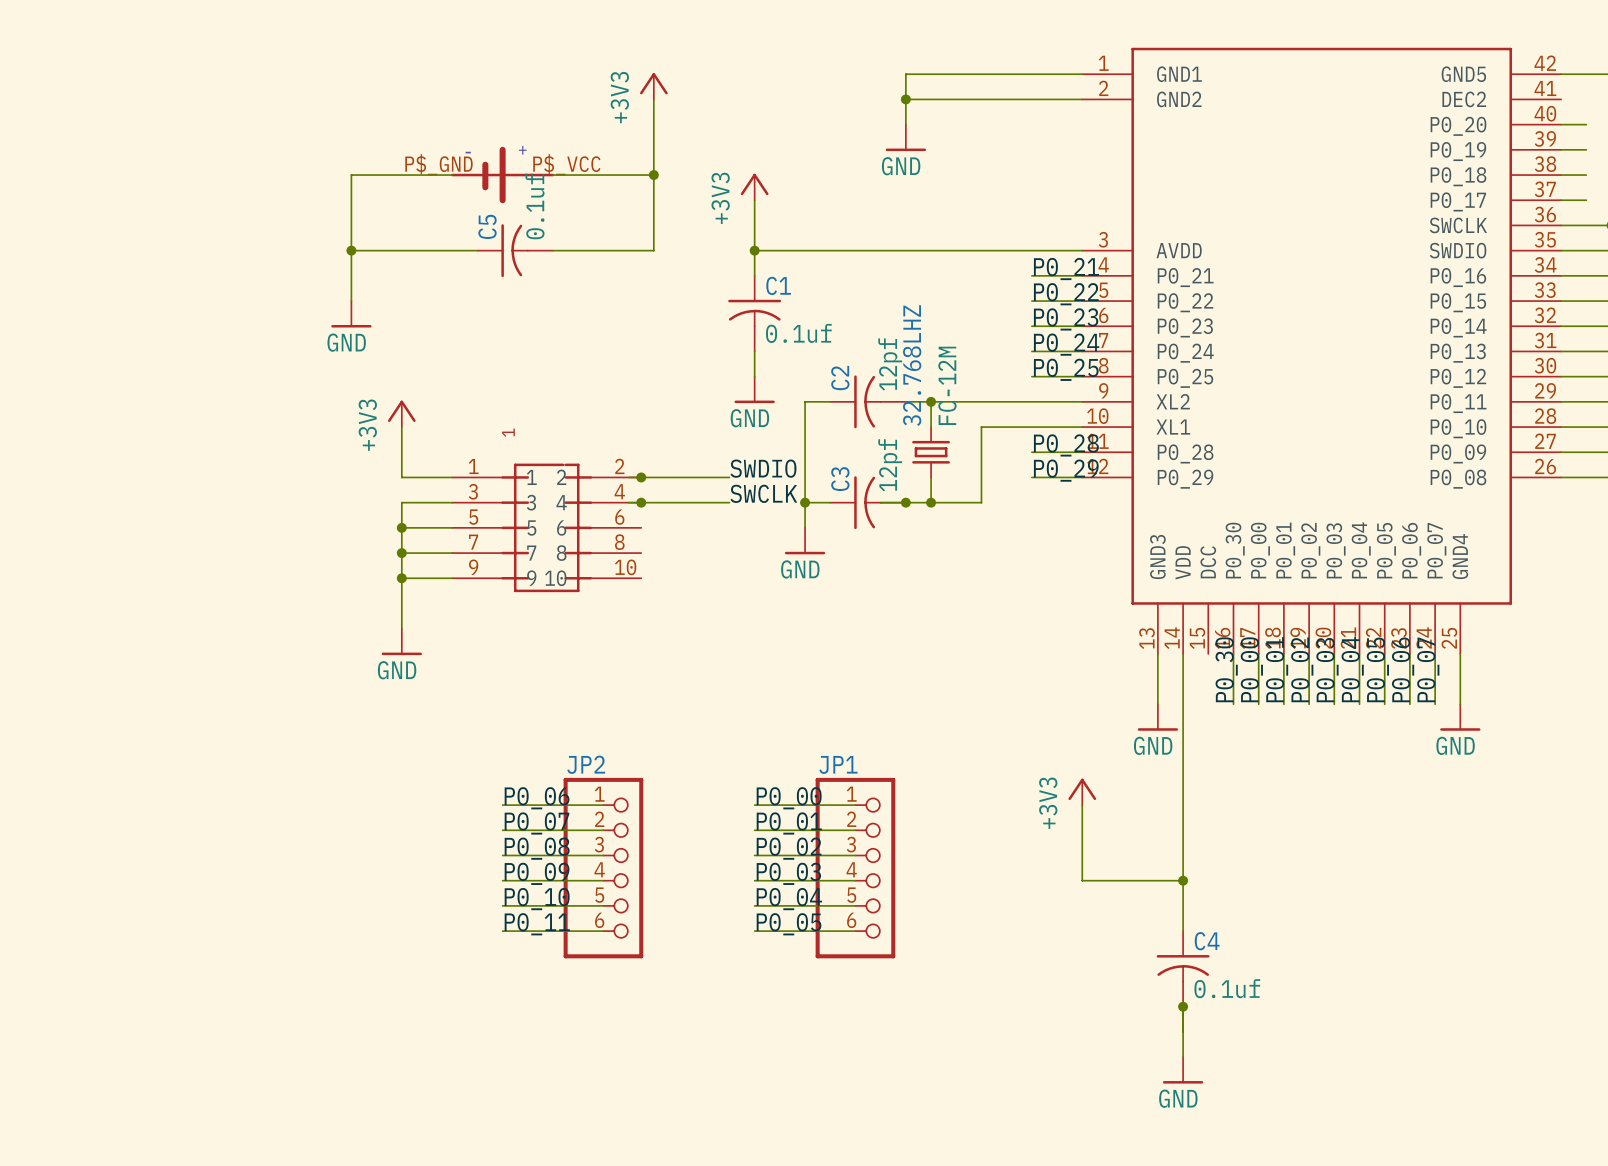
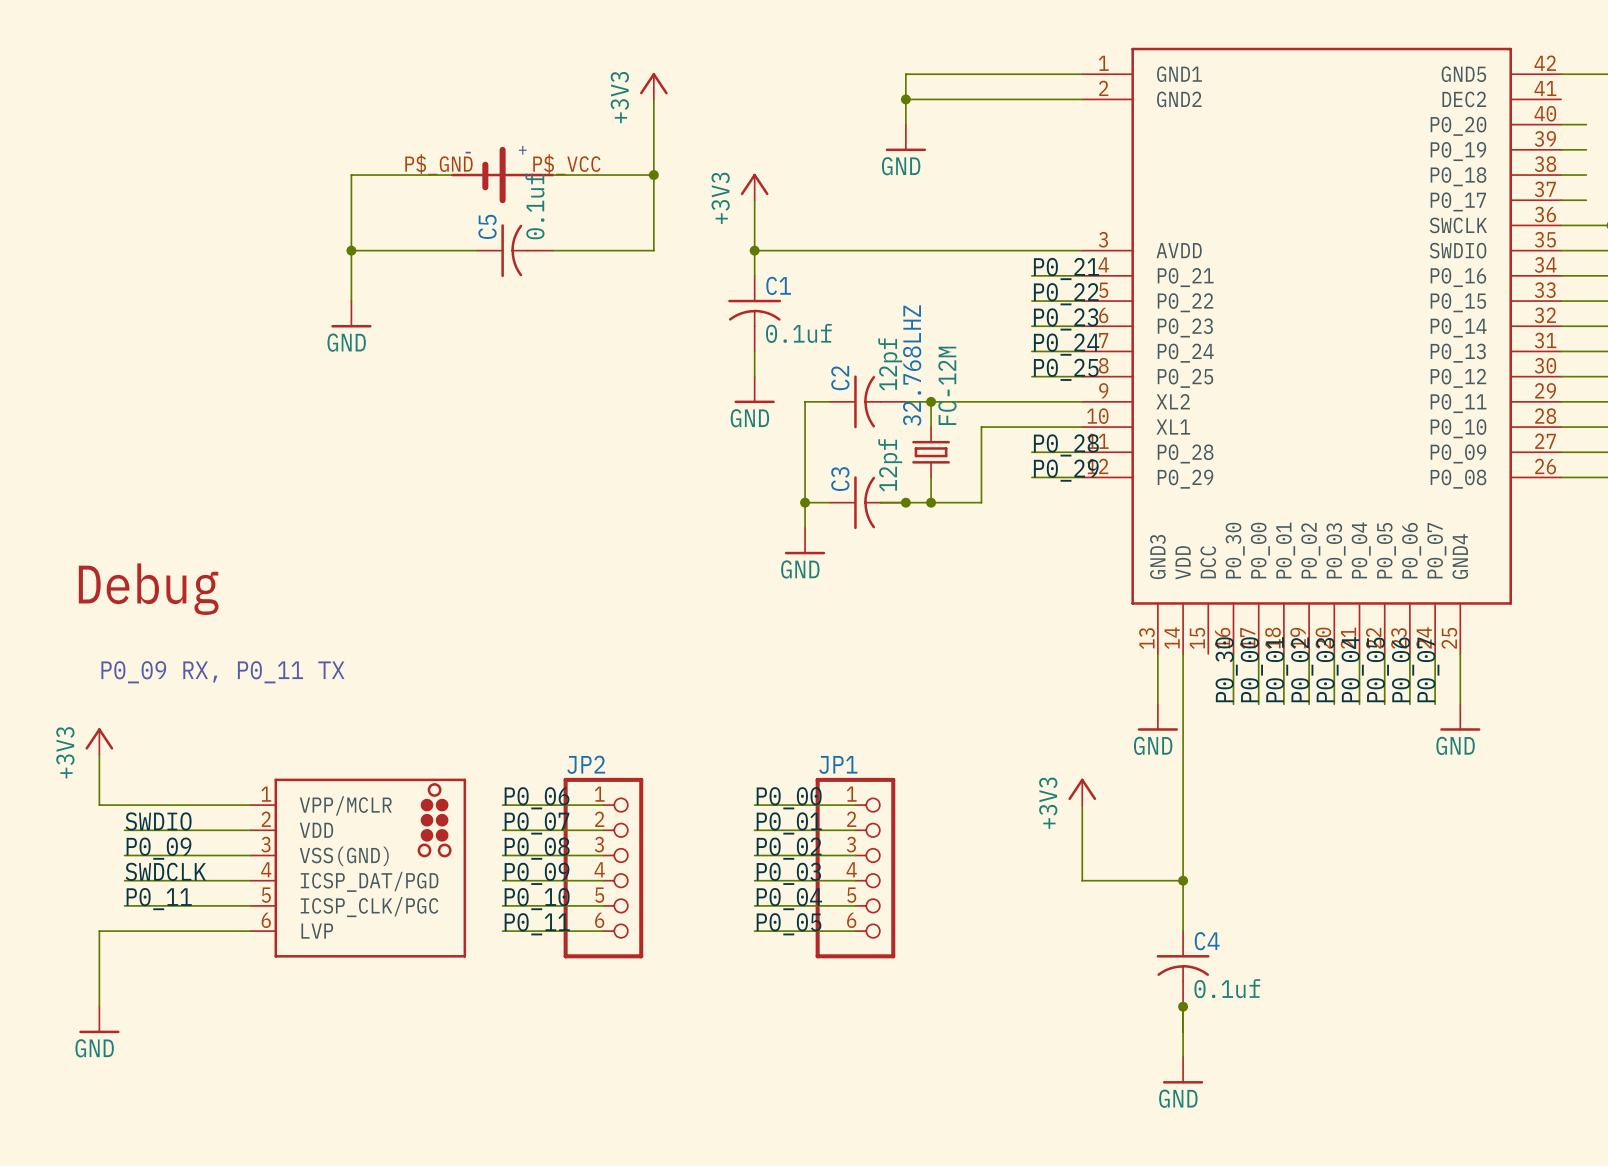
power symbol: +3V3 (401, 413) -> none
wire: (401, 427) (401, 477) (452, 477) -> none
label: SWDIO (763, 468) -> none
wire: (628, 477) (729, 477) -> none
junction: (641, 477) -> none
label: SWCLK (763, 493) -> none
wire: (452, 502) (401, 502) (401, 628) -> none
wire: (628, 502) (729, 502) -> none
junction: (641, 502) -> none
wire: (401, 527) (452, 527) -> none
junction: (401, 527) -> none
part: (546, 527) -> none
wire: (401, 553) (452, 553) -> none
junction: (401, 553) -> none
wire: (401, 578) (452, 578) -> none
junction: (401, 578) -> none
text: none -> Debug (148, 589)
power symbol: GND (401, 641) -> none
text: none -> P0_09 RX, P0_11 TX (222, 672)
power symbol: none -> +3V3 (99, 741)
wire: none -> (99, 754) (99, 805) (250, 805)
label: none -> SWDIO (158, 821)
wire: none -> (124, 830) (250, 830)
label: none -> P0_09 (159, 848)
wire: none -> (124, 855) (250, 855)
part: none -> (358, 868)
label: none -> SWDCLK (165, 871)
wire: none -> (124, 880) (250, 880)
label: none -> P0_11 (159, 899)
wire: none -> (124, 905) (250, 905)
wire: none -> (250, 931) (99, 931) (99, 1006)
power symbol: none -> GND (99, 1019)

